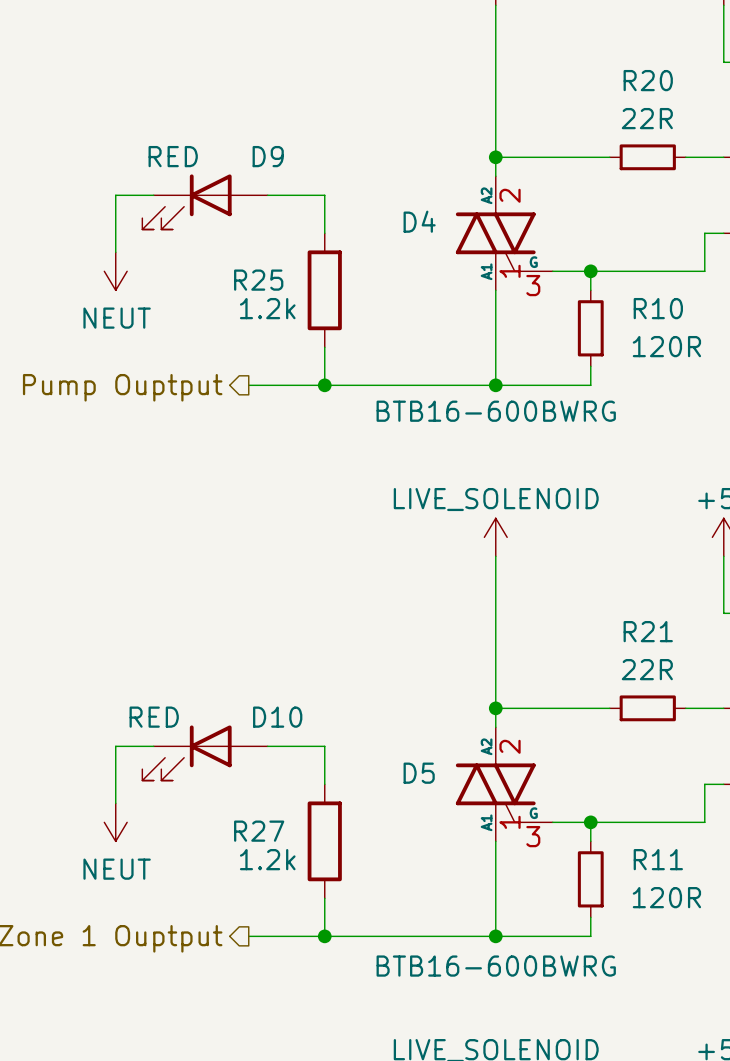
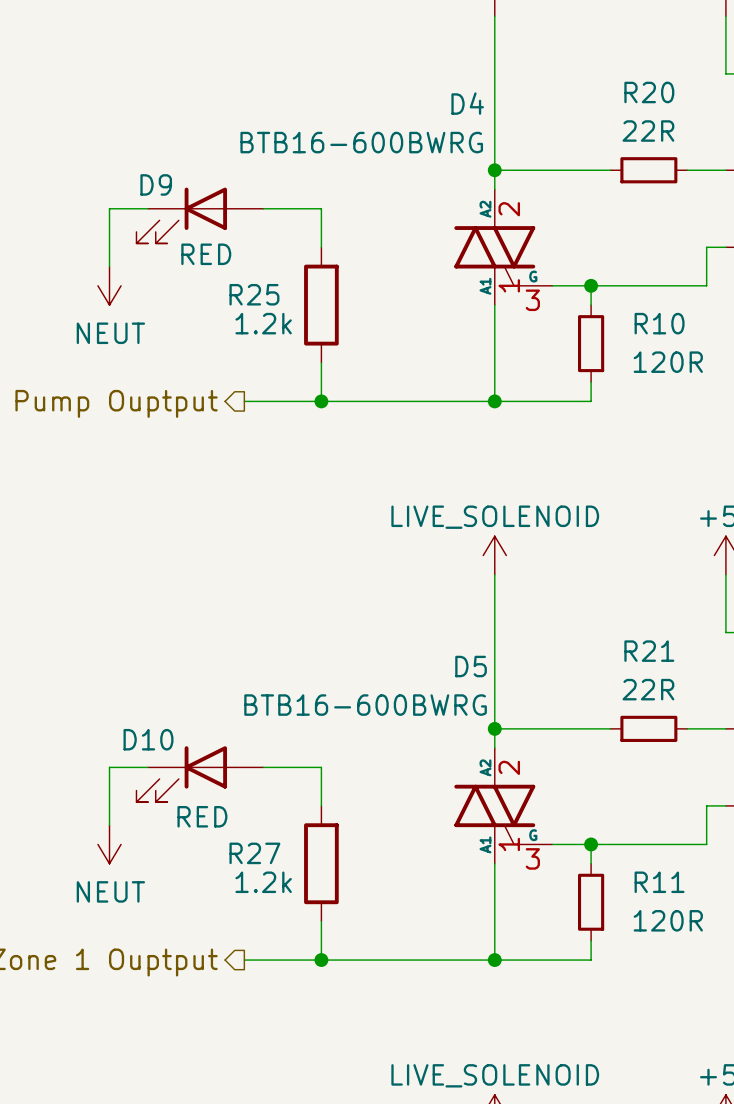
D4 value: none -> BTB16-600BWRG (361, 142)
D9 value position: RED (173, 156) -> RED (206, 254)
D9 name position: D9 (268, 156) -> D9 (156, 184)
D4 name position: D4 (419, 221) -> D4 (467, 103)
D4 text: BTB16-600BWRG (496, 411) -> none
D5 value: none -> BTB16-600BWRG (365, 705)
D10 value position: RED (154, 717) -> RED (202, 816)
D10 name position: D10 (277, 717) -> D10 (148, 739)
D5 name position: D5 (419, 773) -> D5 (471, 666)
D5 text: BTB16-600BWRG (496, 966) -> none

